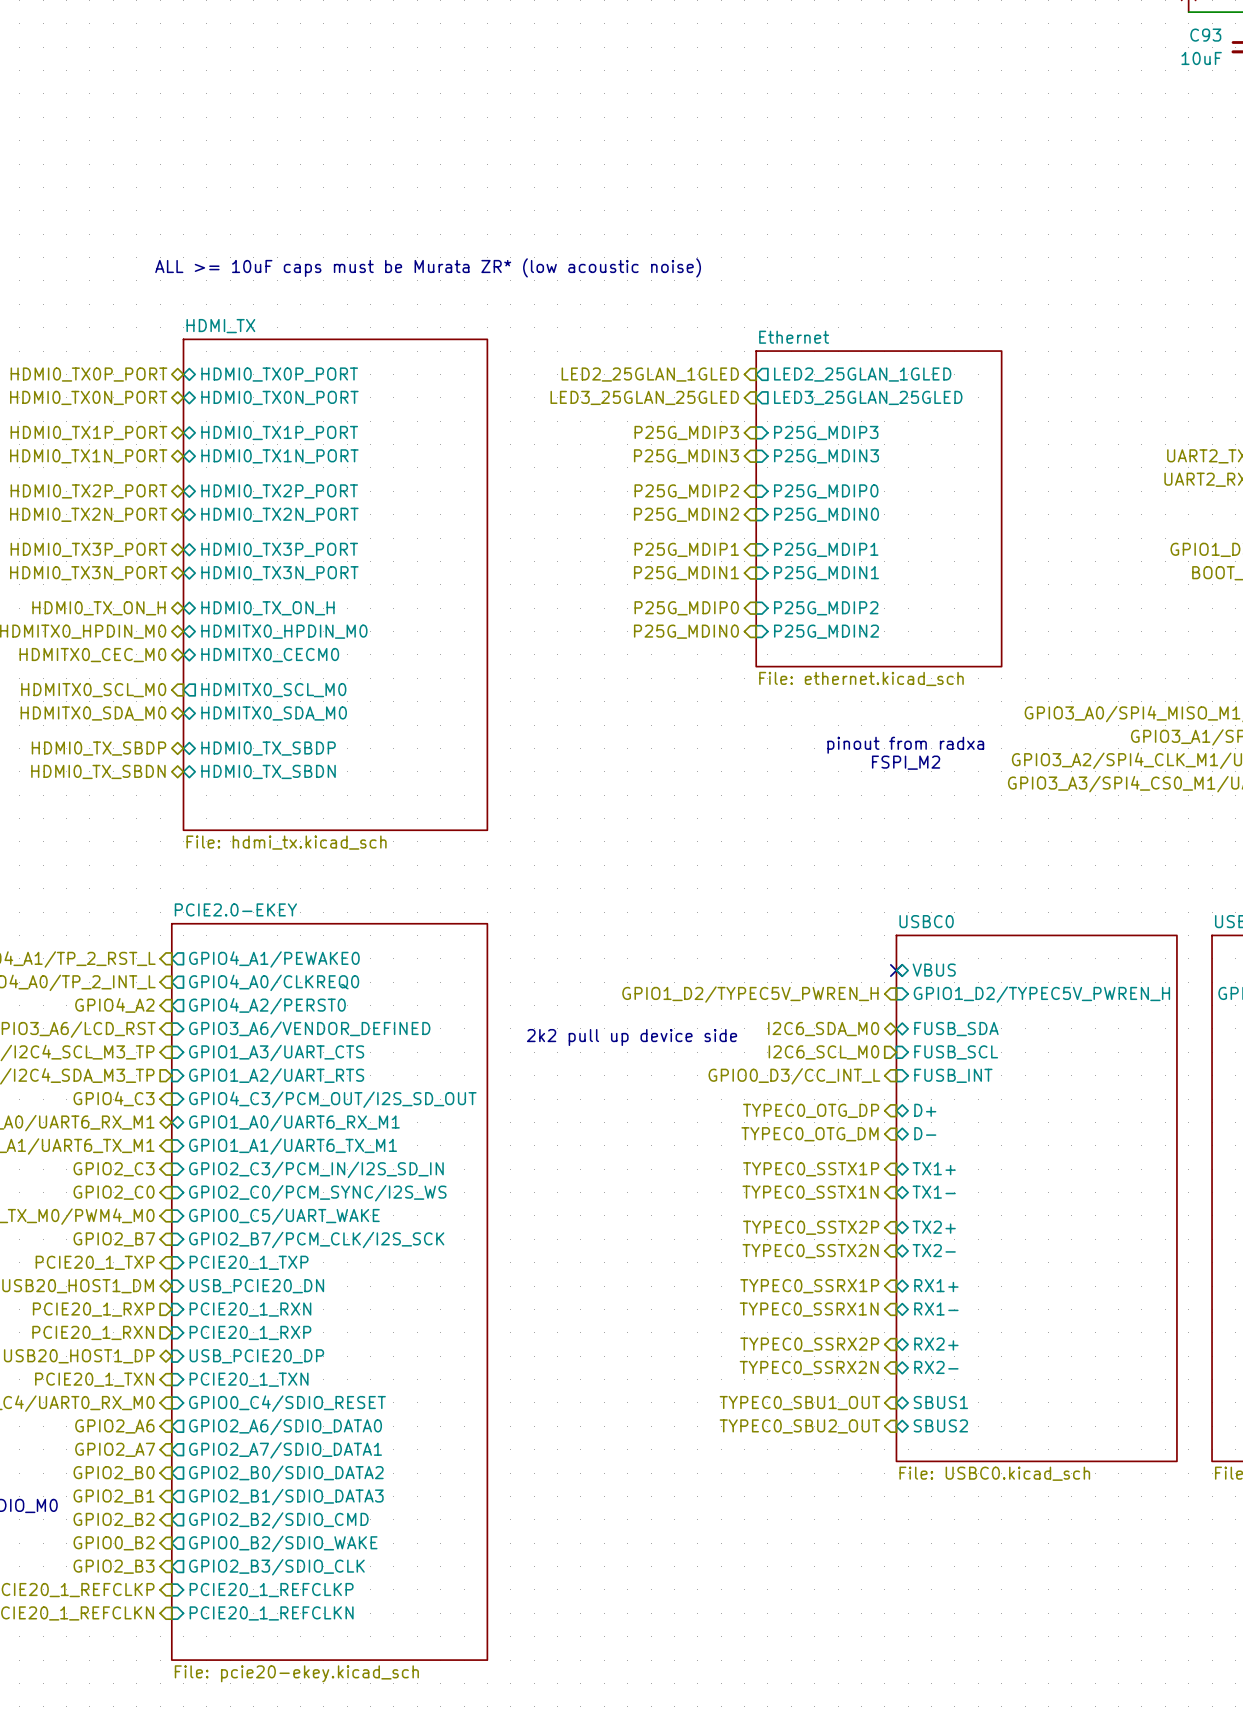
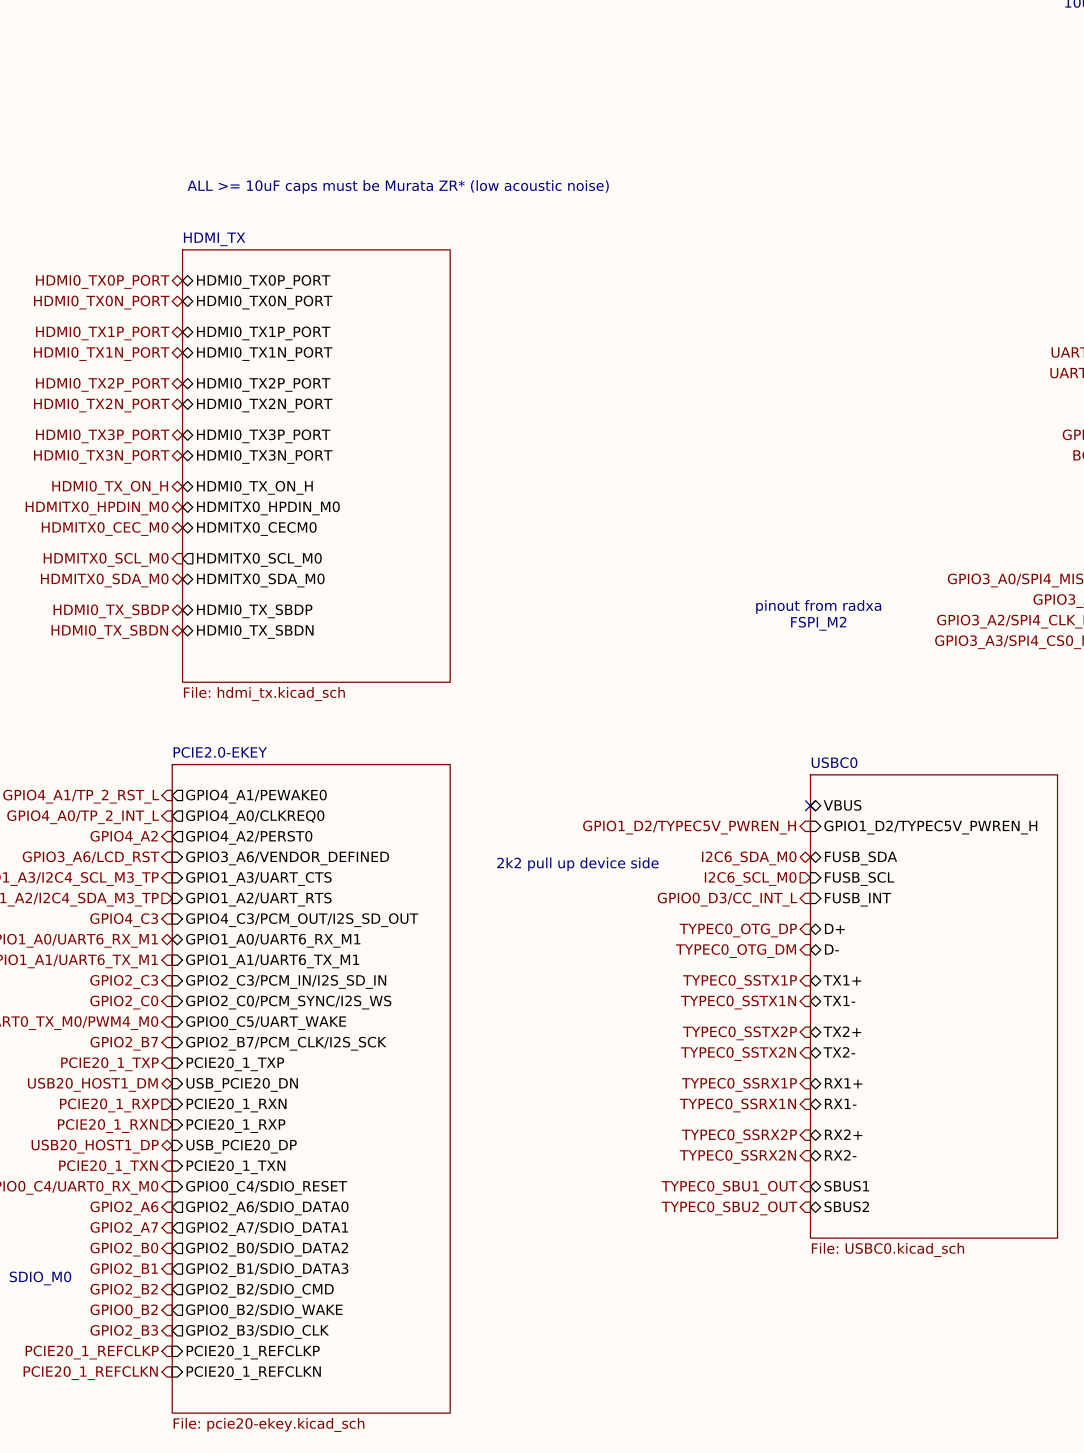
hierarchical label: LED2_25GLAN_1GLED (650, 374) -> none
sheet pin: LED2_25GLAN_1GLED (862, 374) -> none
hierarchical label: LED3_25GLAN_25GLED (644, 397) -> none
sheet pin: LED3_25GLAN_25GLED (868, 397) -> none
hierarchical label: P25G_MDIP3 (686, 432) -> none
sheet pin: P25G_MDIP3 (826, 432) -> none
hierarchical label: P25G_MDIN3 (686, 456) -> none
sheet pin: P25G_MDIN3 (826, 456) -> none
hierarchical label: P25G_MDIP2 (686, 491) -> none
sheet pin: P25G_MDIP0 (826, 491) -> none
sheet Ethernet: File: ethernet.kicad_sch (878, 508) -> none
hierarchical label: P25G_MDIN2 (686, 514) -> none
sheet pin: P25G_MDIN0 (826, 514) -> none
hierarchical label: P25G_MDIP1 (686, 549) -> none
sheet pin: P25G_MDIP1 (826, 549) -> none
hierarchical label: P25G_MDIN1 (686, 573) -> none
sheet pin: P25G_MDIN1 (826, 573) -> none
hierarchical label: P25G_MDIP0 (686, 608) -> none
sheet pin: P25G_MDIP2 (826, 608) -> none
hierarchical label: P25G_MDIN0 (686, 631) -> none
sheet pin: P25G_MDIN2 (826, 631) -> none

